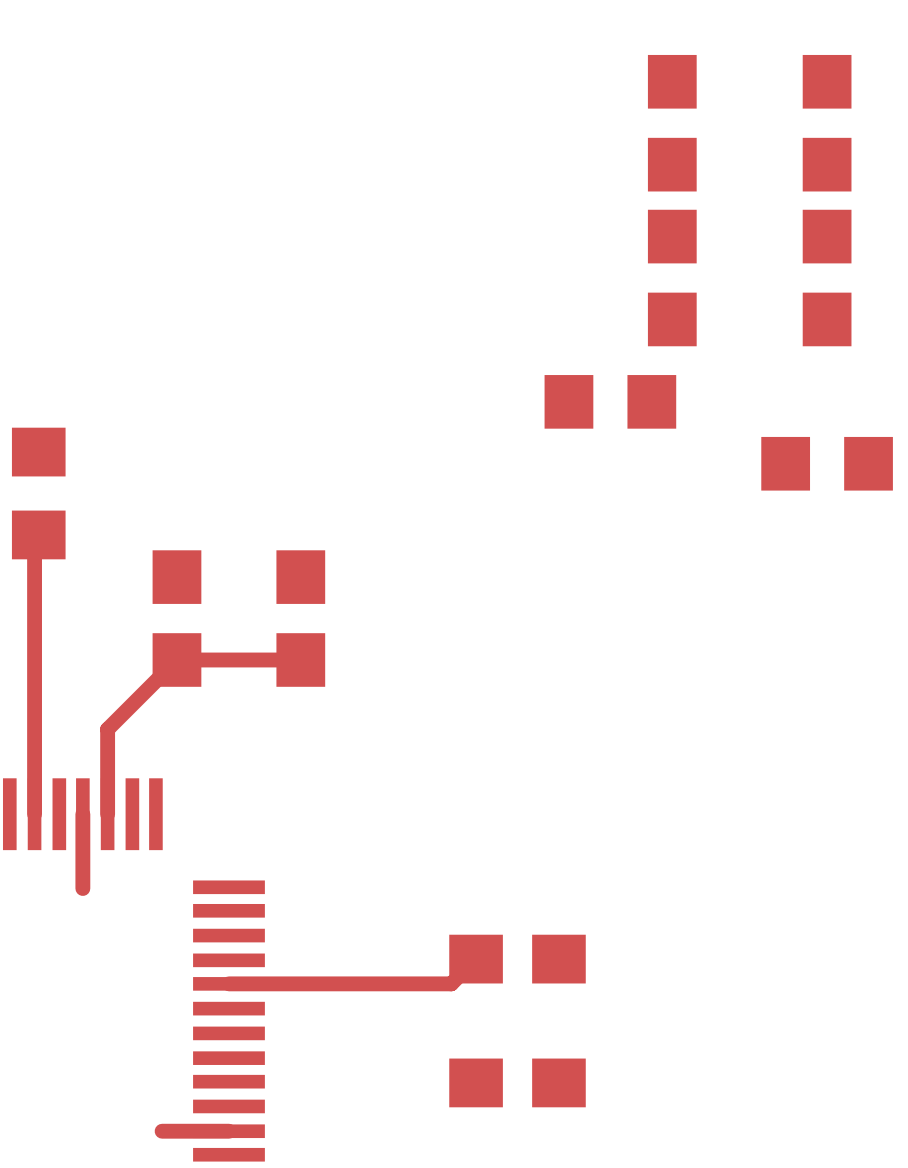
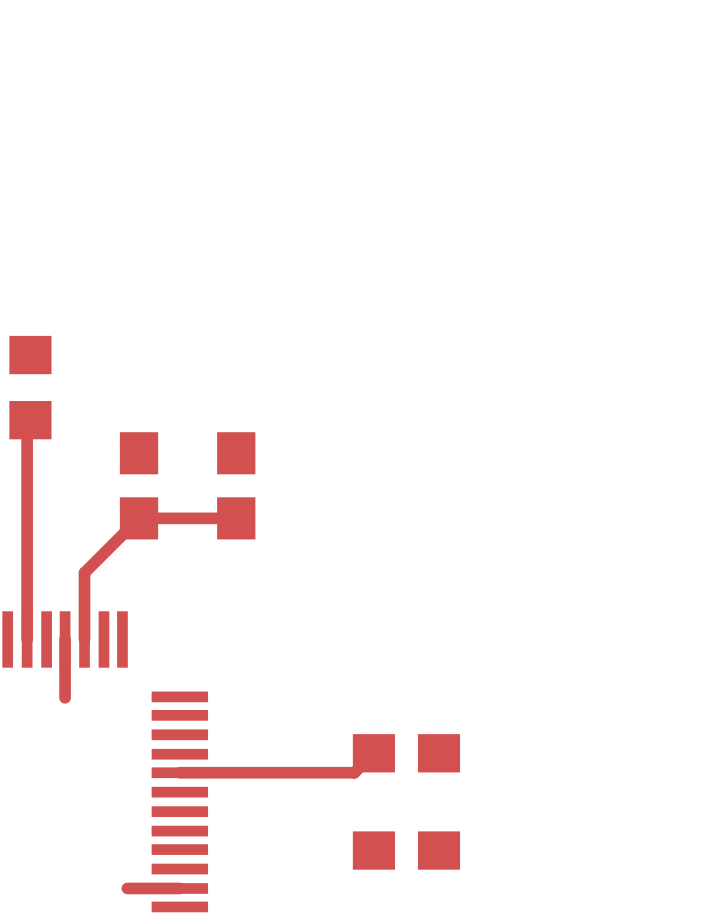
part: (672, 123) -> none
part: (827, 123) -> none
part: (672, 278) -> none
part: (827, 278) -> none
part: (610, 401) -> none
part: (827, 463) -> none

